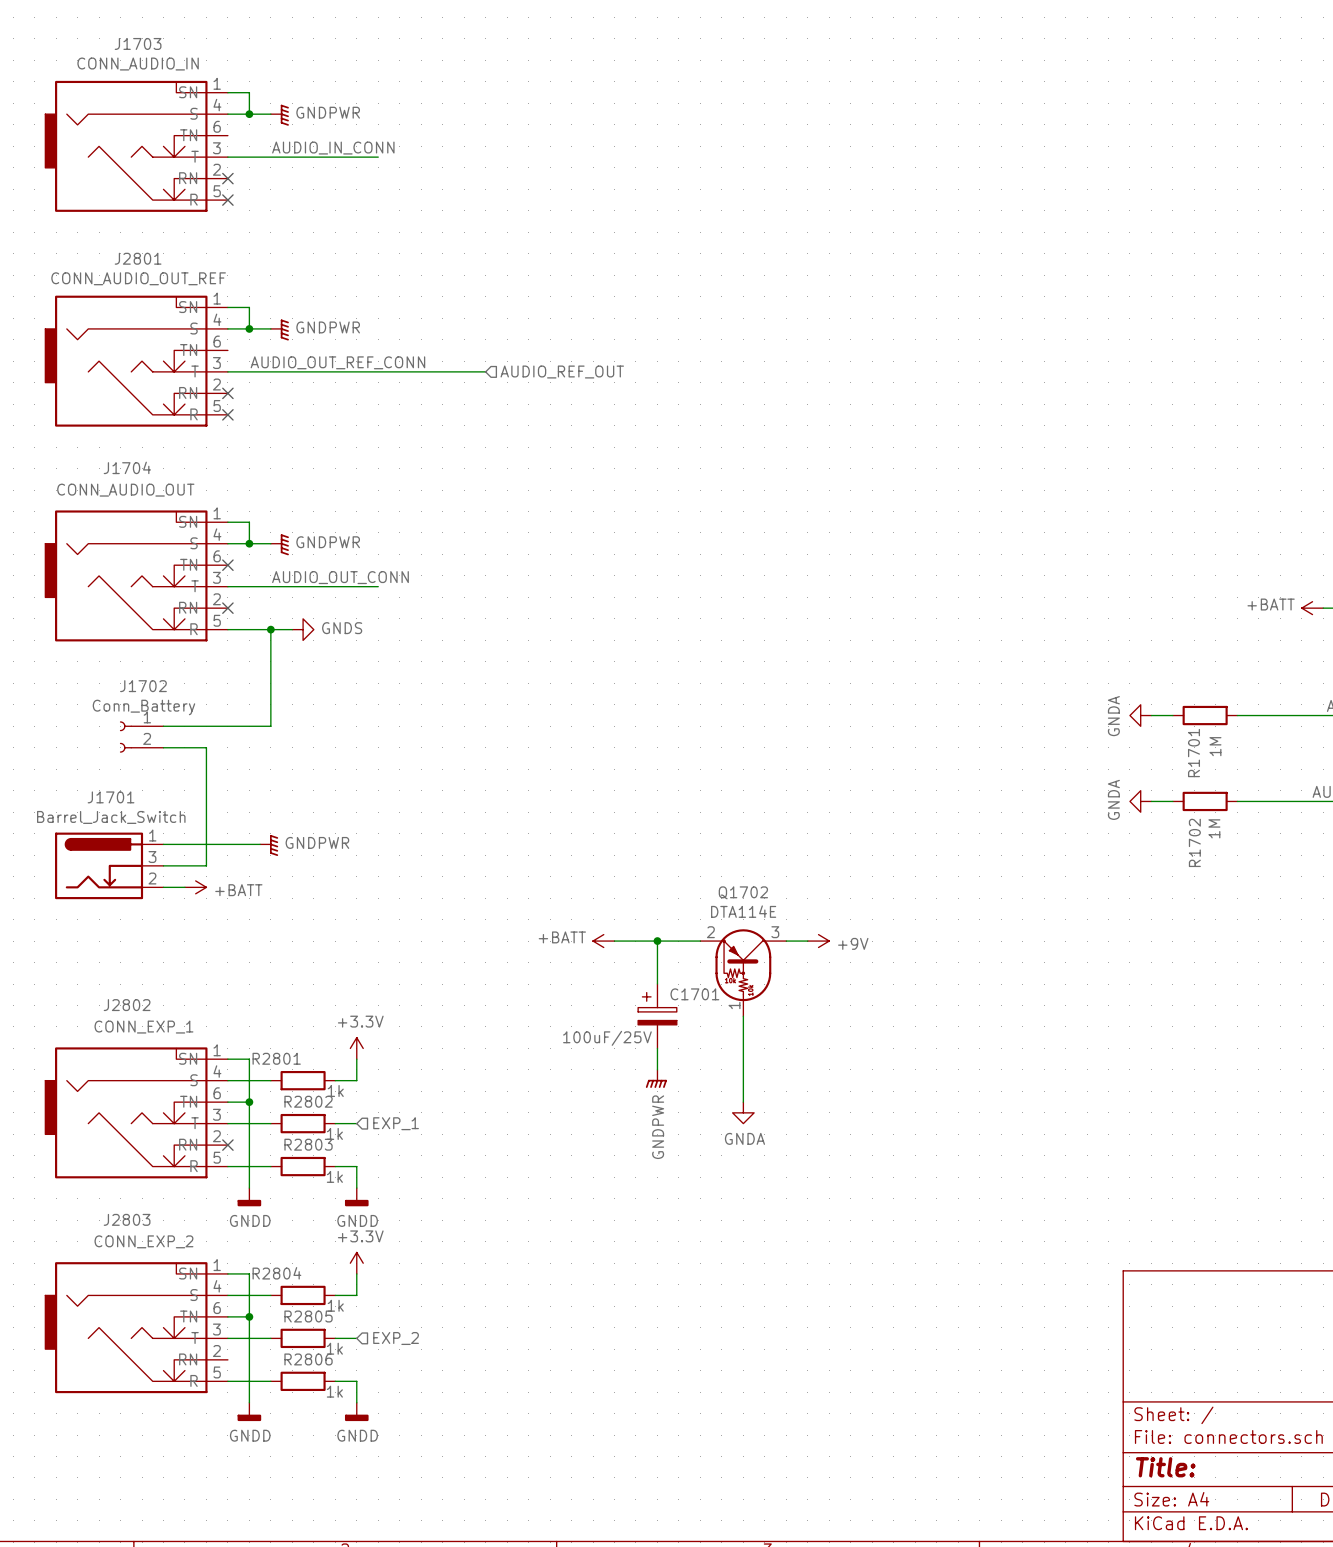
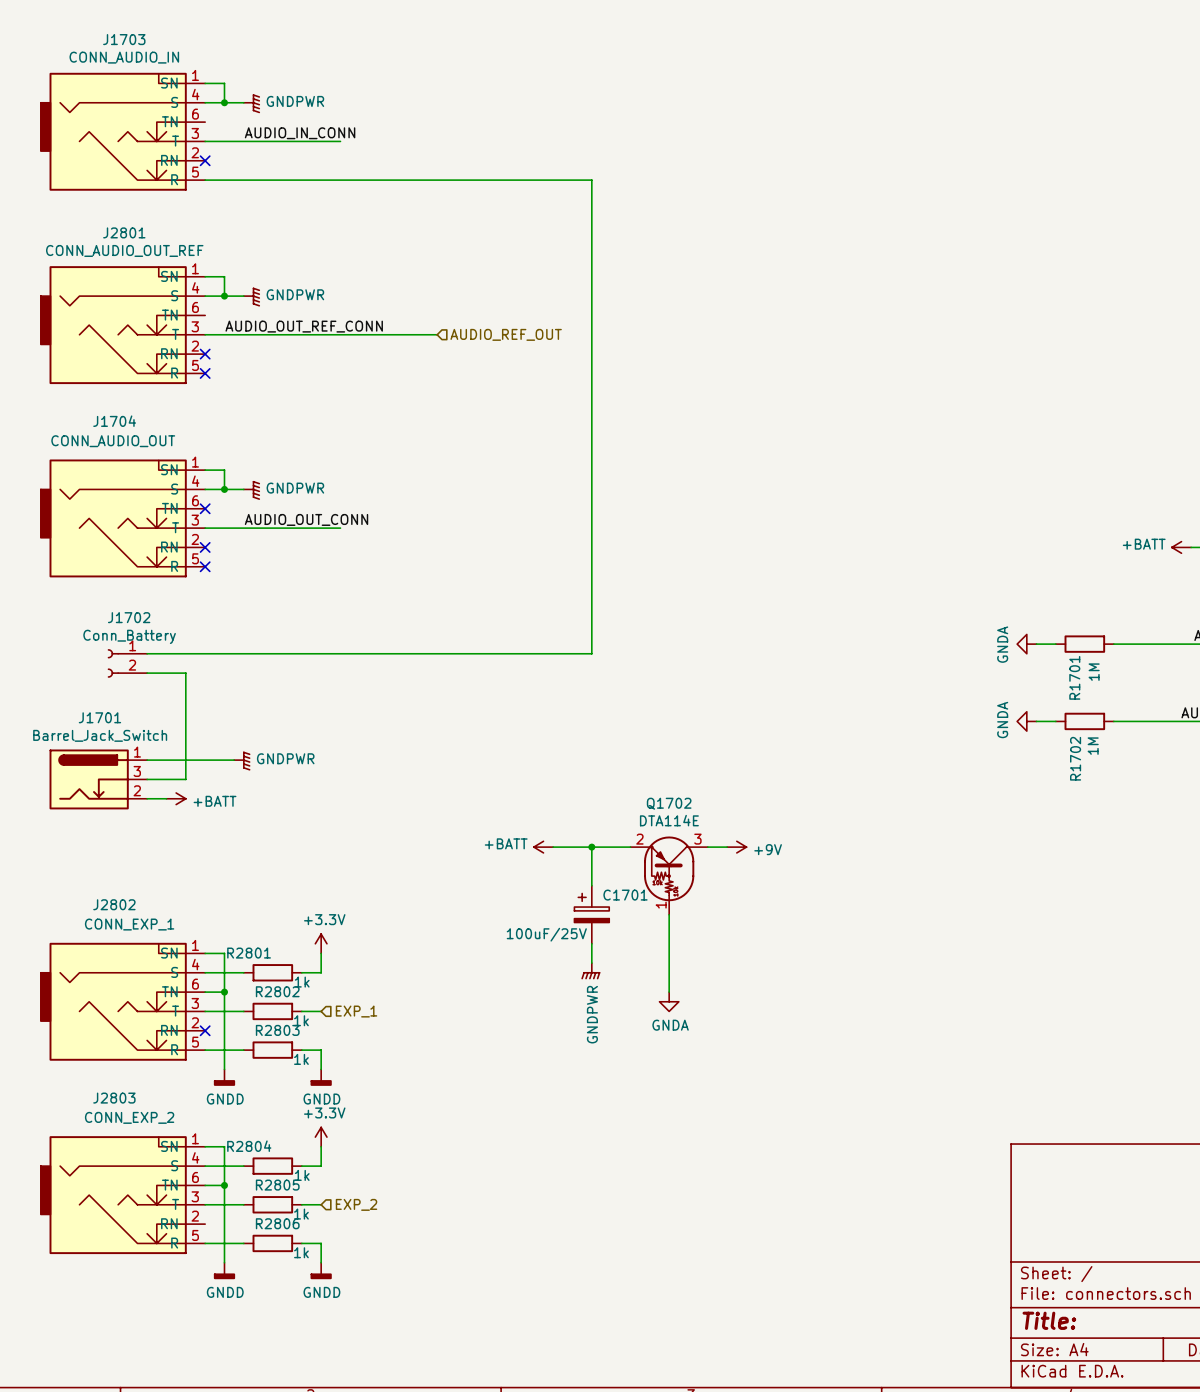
no-connect mark: (227, 200) -> none
wire: (227, 629) (292, 629) -> none
no-connect mark: none -> (205, 566)
wire: (270, 629) (270, 726) -> (205, 180) (591, 180) (591, 653) (243, 653)
junction: (270, 629) -> none
power symbol: GNDS (303, 629) -> none

